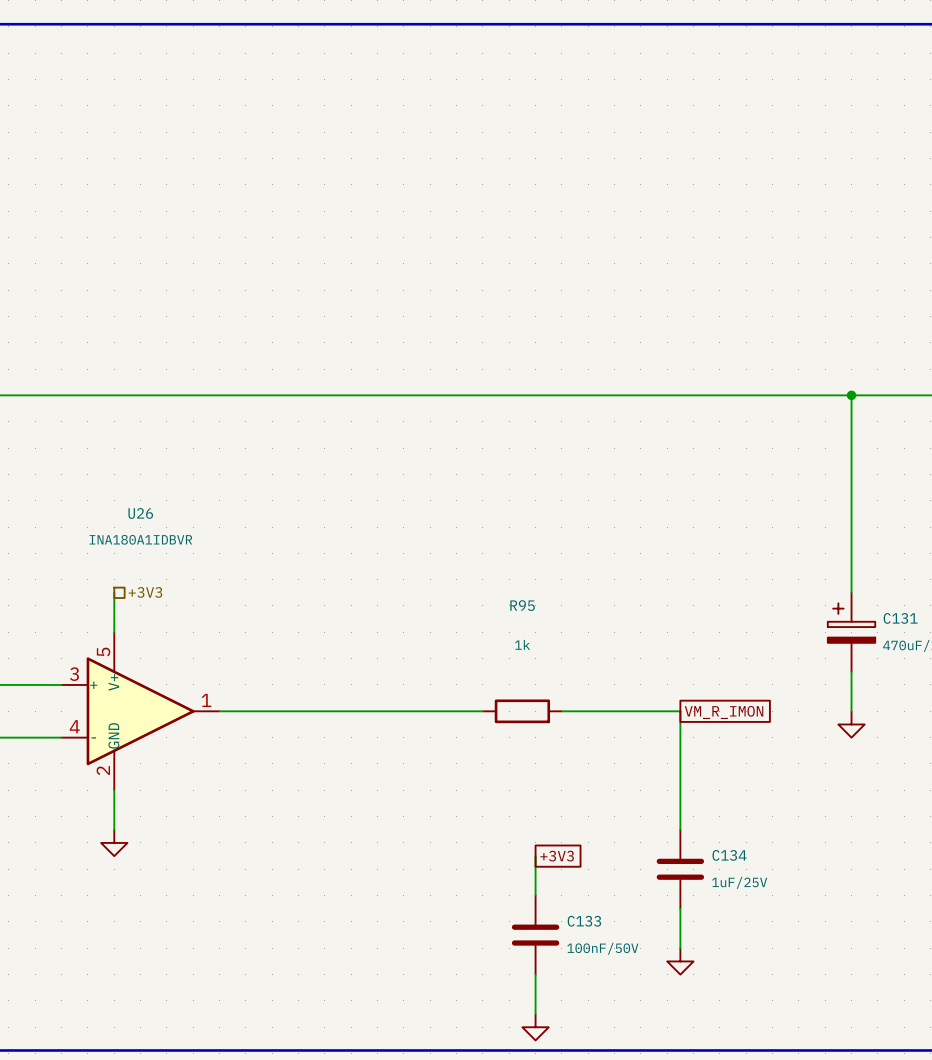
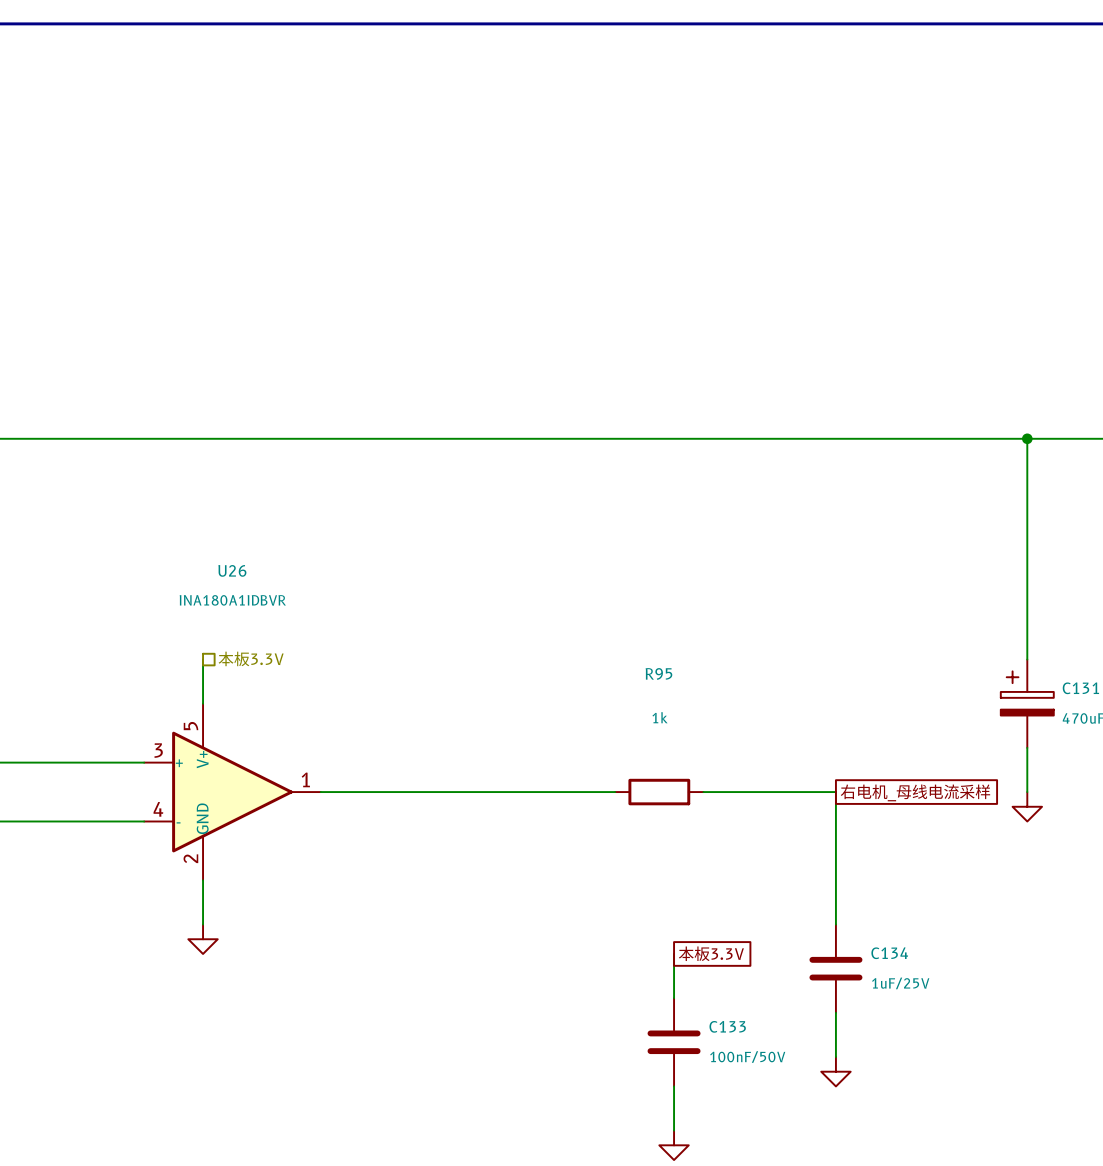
hierarchical label: +3V3 (145, 592) -> 本板3.3V (251, 658)
global label: VM_R_IMON (724, 712) -> 右电机_母线电流采样 (915, 792)
global label: +3V3 (557, 856) -> 本板3.3V (711, 953)

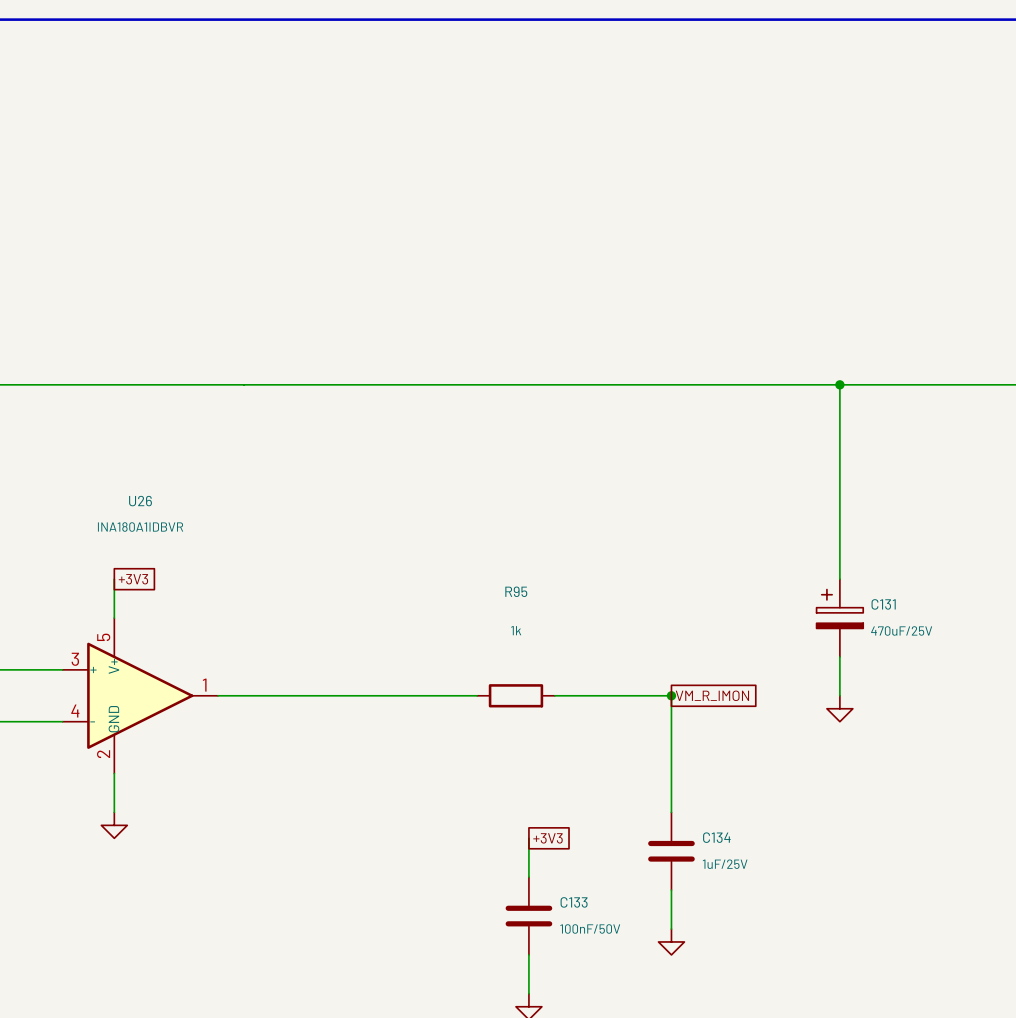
hierarchical label: 本板3.3V (251, 658) -> none
global label: none -> +3V3 (133, 579)
junction: none -> (671, 695)
global label: 右电机_母线电流采样 (915, 792) -> VM_R_IMON (712, 695)
global label: 本板3.3V (711, 953) -> +3V3 (548, 838)

